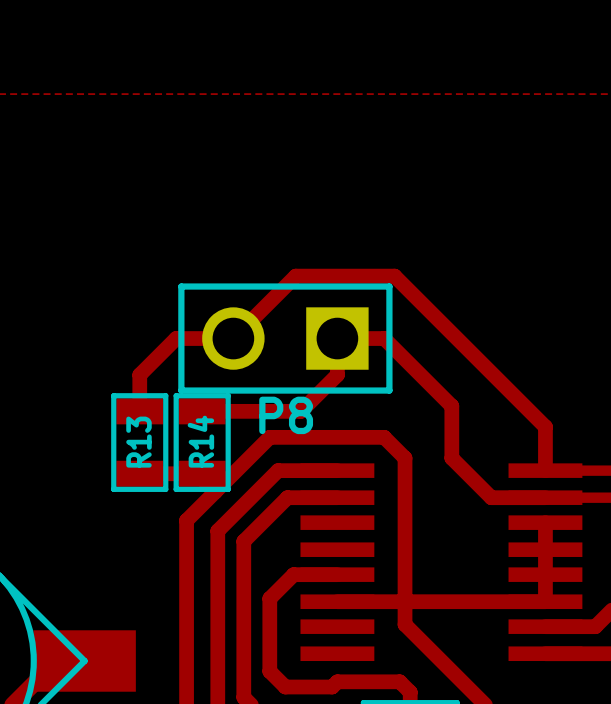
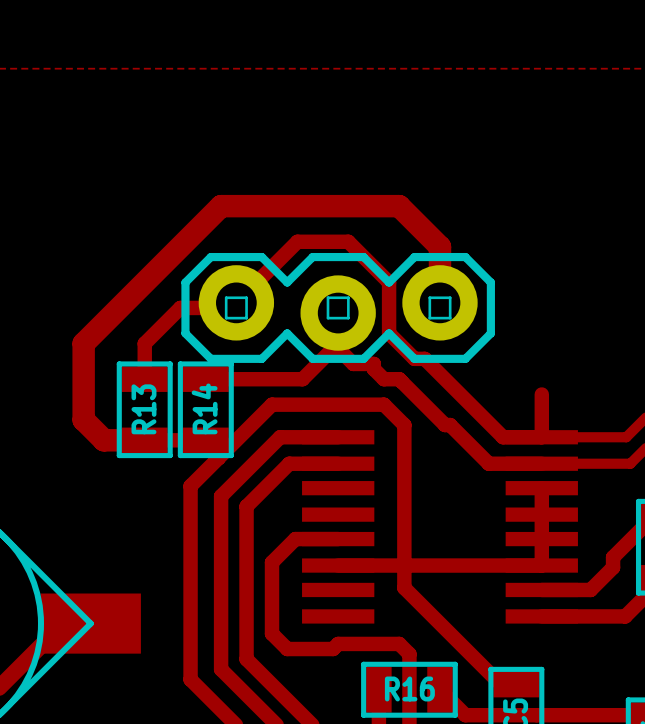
top track: none -> (236, 302) (297, 241) (348, 241) (389, 282) (389, 333) (414, 358) (424, 358) (503, 437) (541, 437)
top track: none -> (439, 302) (439, 246) (399, 206) (221, 206) (83, 343) (83, 419) (104, 440) (144, 440)
top track: (233, 338) (295, 276) (394, 276) (545, 426) -> none
P8: (285, 338) -> none
top track: (337, 338) (384, 338) (451, 406) (451, 458) -> (338, 343) (338, 348) (353, 363) (373, 363) (373, 369) (383, 379) (399, 379) (445, 425) (450, 425)
part: none -> (338, 307)

